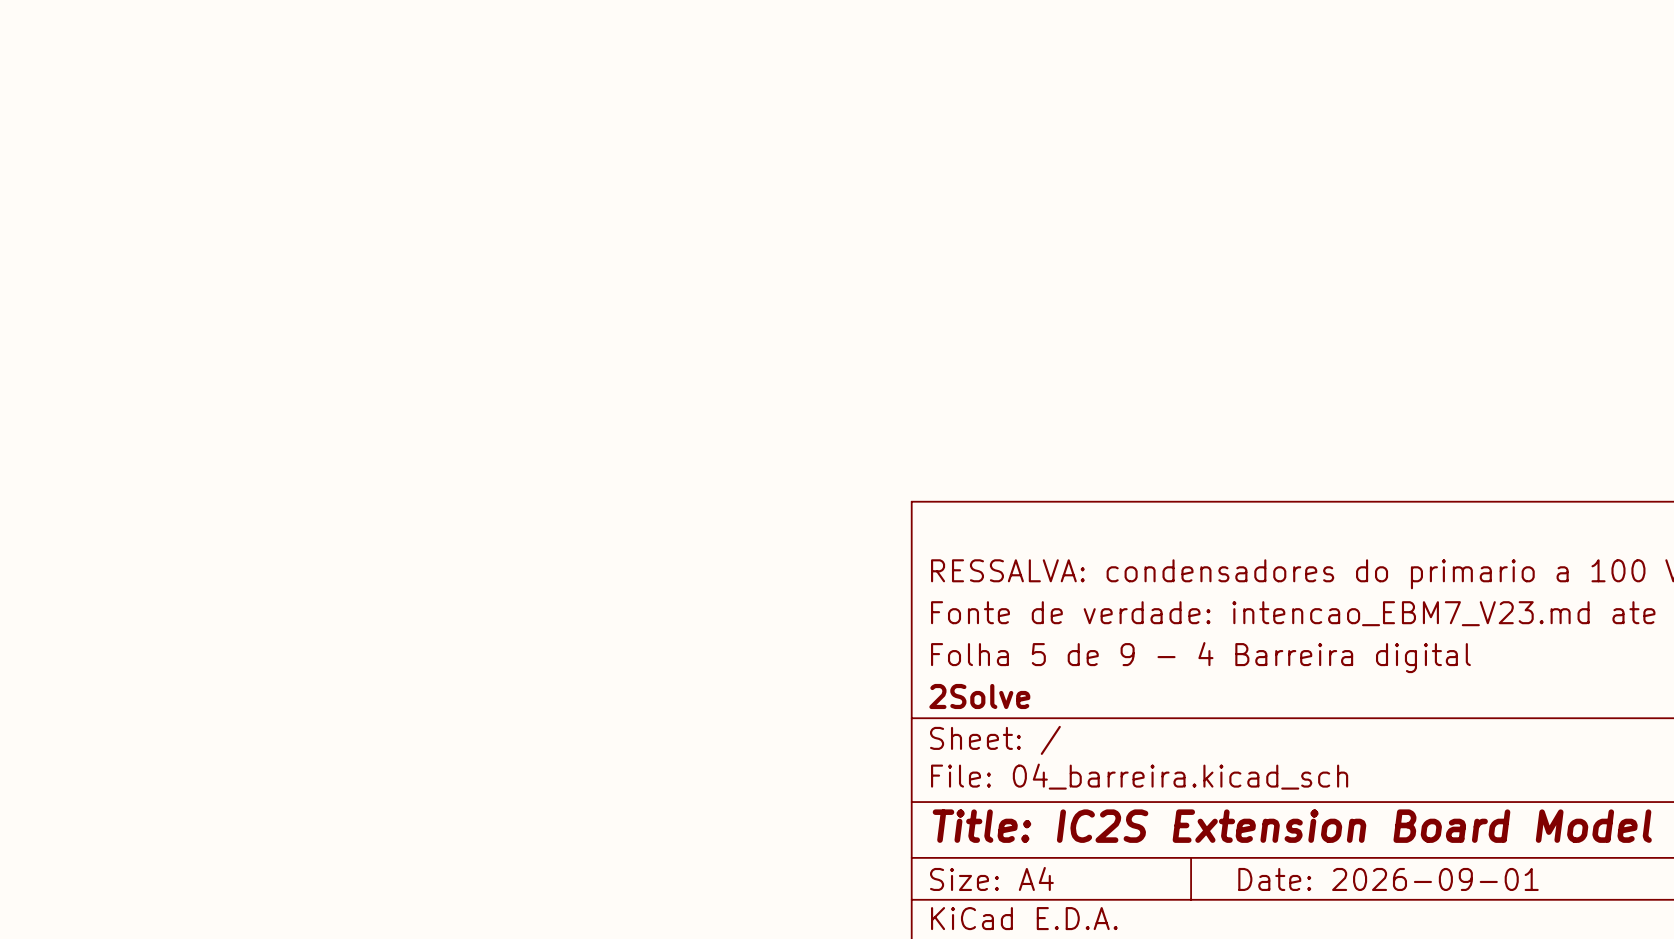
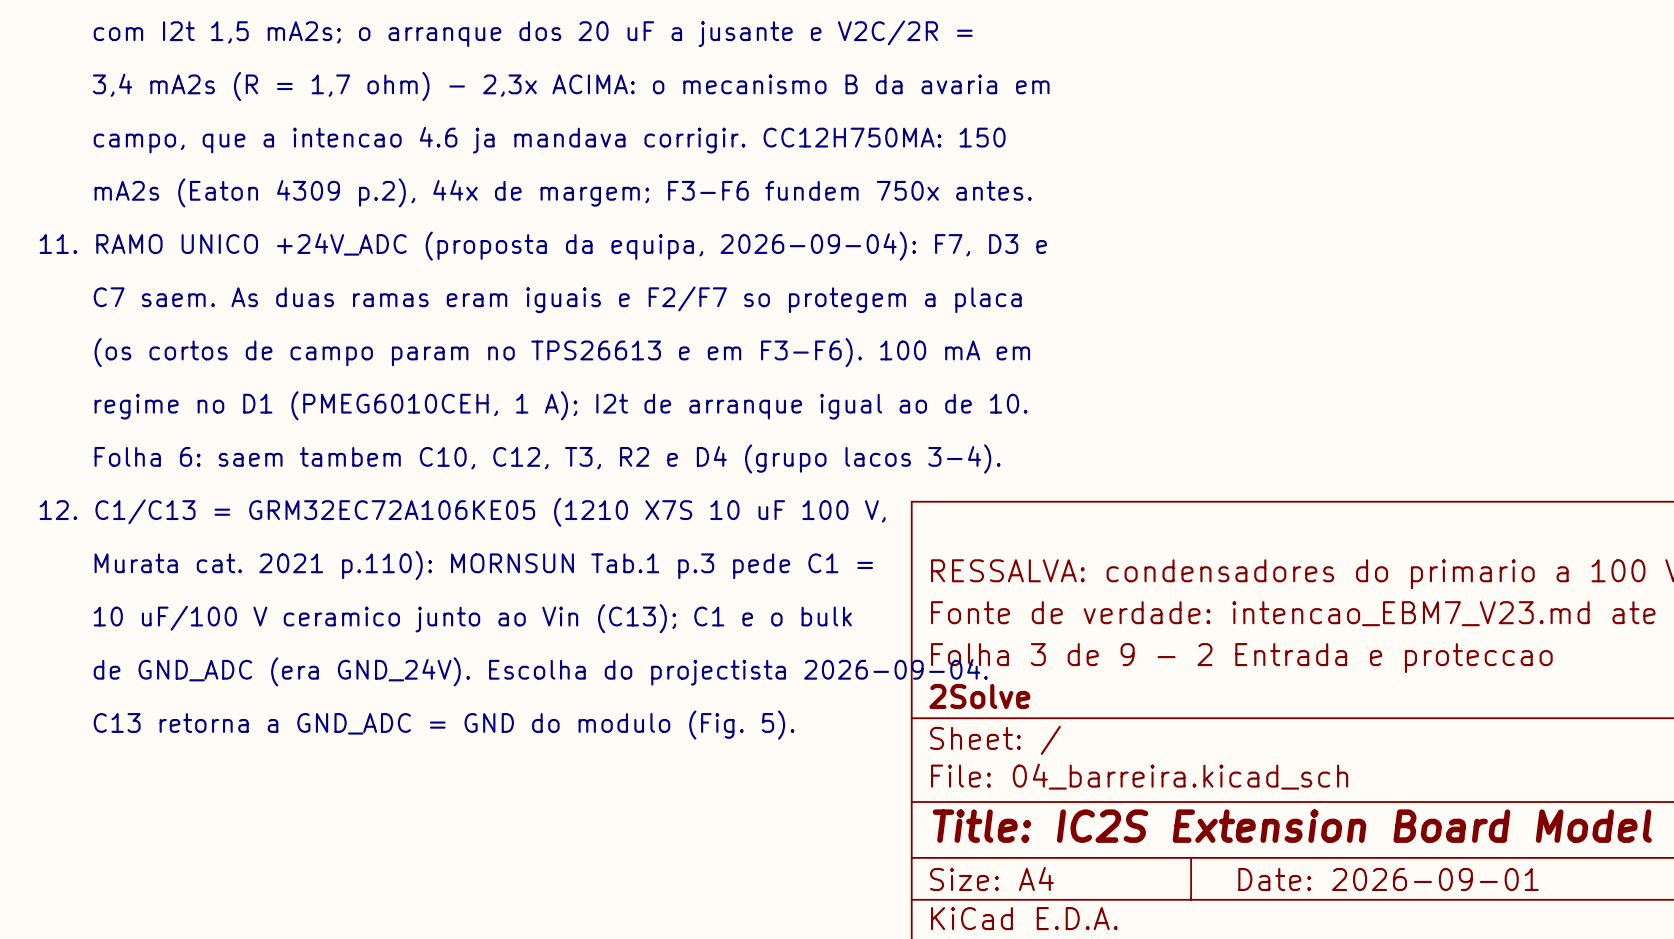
text: none -> com I2t 1,5 mA2s; o arranque dos 20 uF a jusante e V2C/2R = (533, 33)
text: none -> 3,4 mA2s (R = 1,7 ohm) - 2,3x ACIMA: o mecanismo B da avaria em (571, 86)
text: none -> campo, que a intencao 4.6 ja mandava corrigir. CC12H750MA: 150 (549, 140)
text: none -> mA2s (Eaton 4309 p.2), 44x de margem; F3-F6 fundem 750x antes. (563, 192)
text: none -> 11. RAMO UNICO +24V_ADC (proposta da equipa, 2026-09-04): F7, D3 e (543, 246)
text: none -> C7 saem. As duas ramas eram iguais e F2/F7 so protegem a placa (557, 299)
text: none -> (os cortos de campo param no TPS26613 e em F3-F6). 100 mA em (562, 352)
text: none -> regime no D1 (PMEG6010CEH, 1 A); I2t de arranque igual ao de 10. (561, 405)
text: none -> Folha 6: saem tambem C10, C12, T3, R2 e D4 (grupo lacos 3-4). (547, 459)
text: none -> 12. C1/C13 = GRM32EC72A106KE05 (1210 X7S 10 uF 100 V, (462, 512)
text: none -> Murata cat. 2021 p.110): MORNSUN Tab.1 p.3 pede C1 = (483, 565)
text: none -> 10 uF/100 V ceramico junto ao Vin (C13); C1 e o bulk (472, 618)
title block: Folha 5 de 9 - 4 Barreira digital (1200, 657) -> Folha 3 de 9 - 2 Entrada e proteccao (1241, 658)
text: none -> de GND_ADC (era GND_24V). Escolha do projectista 2026-09-04. (540, 671)
text: none -> C13 retorna a GND_ADC = GND do modulo (Fig. 5). (444, 725)

